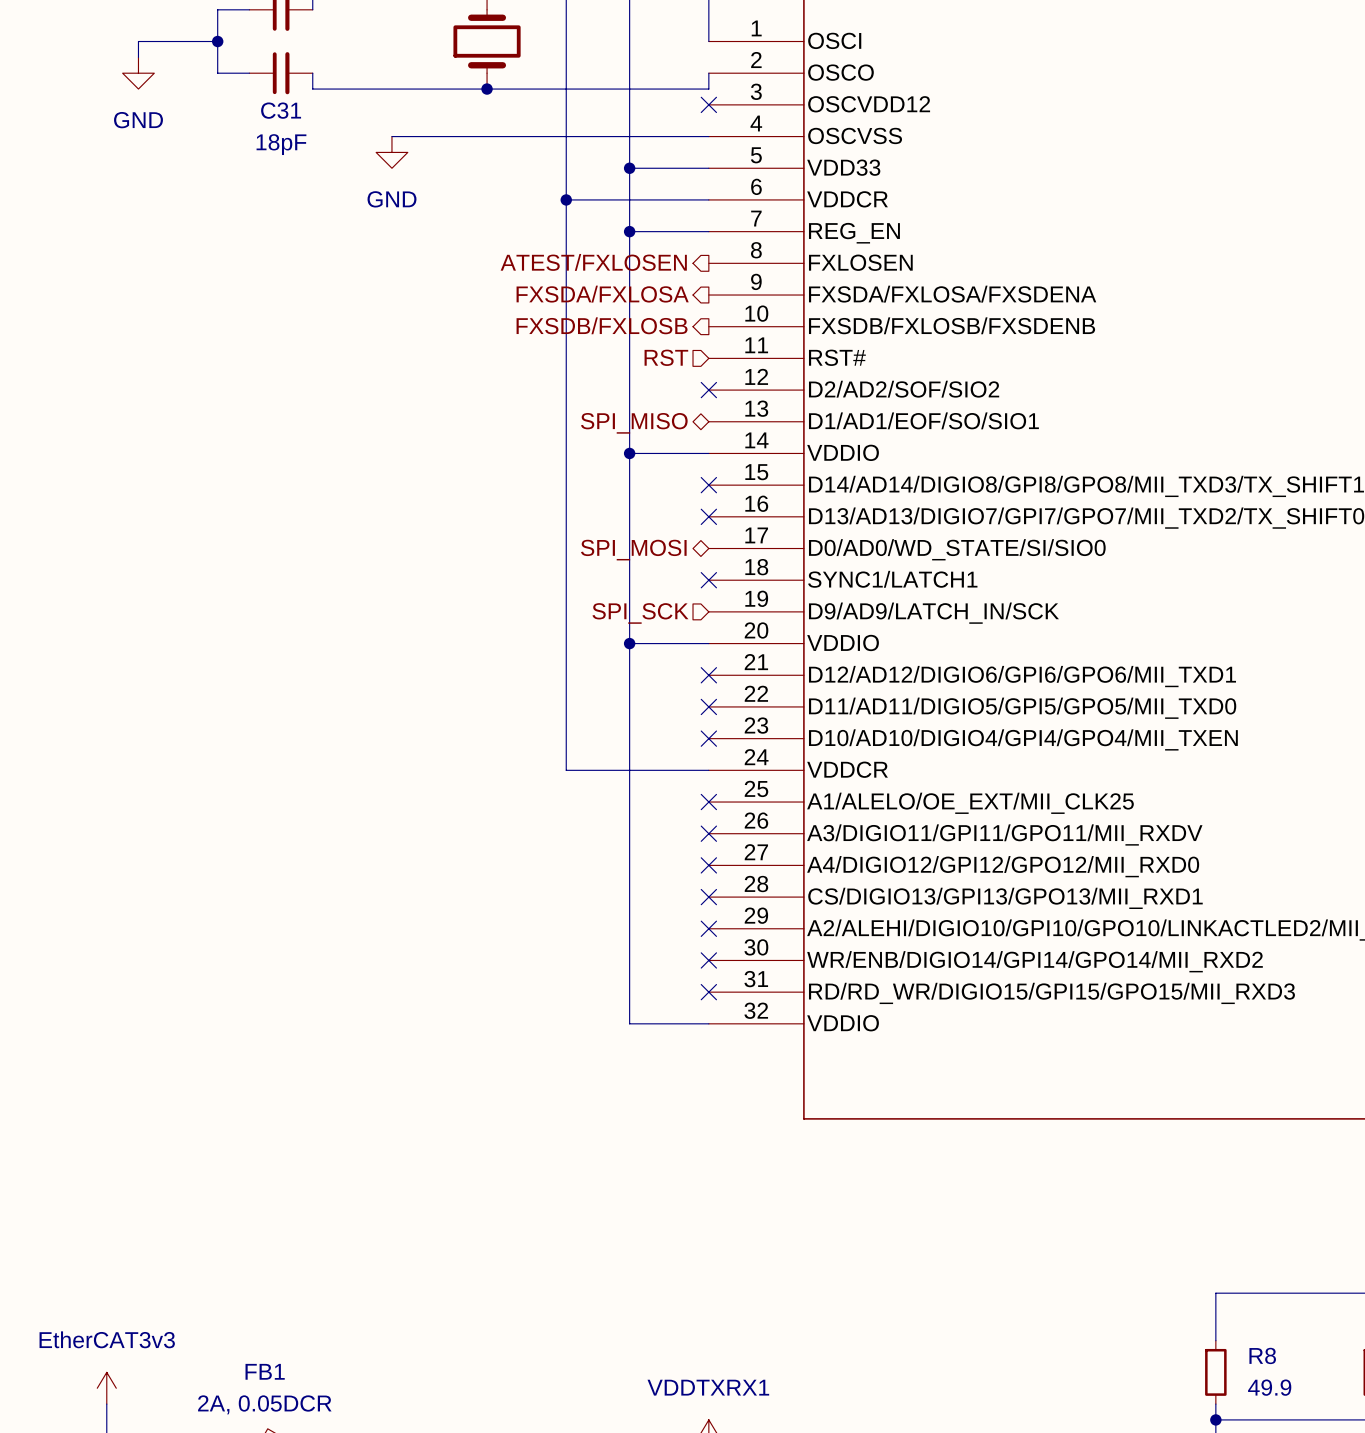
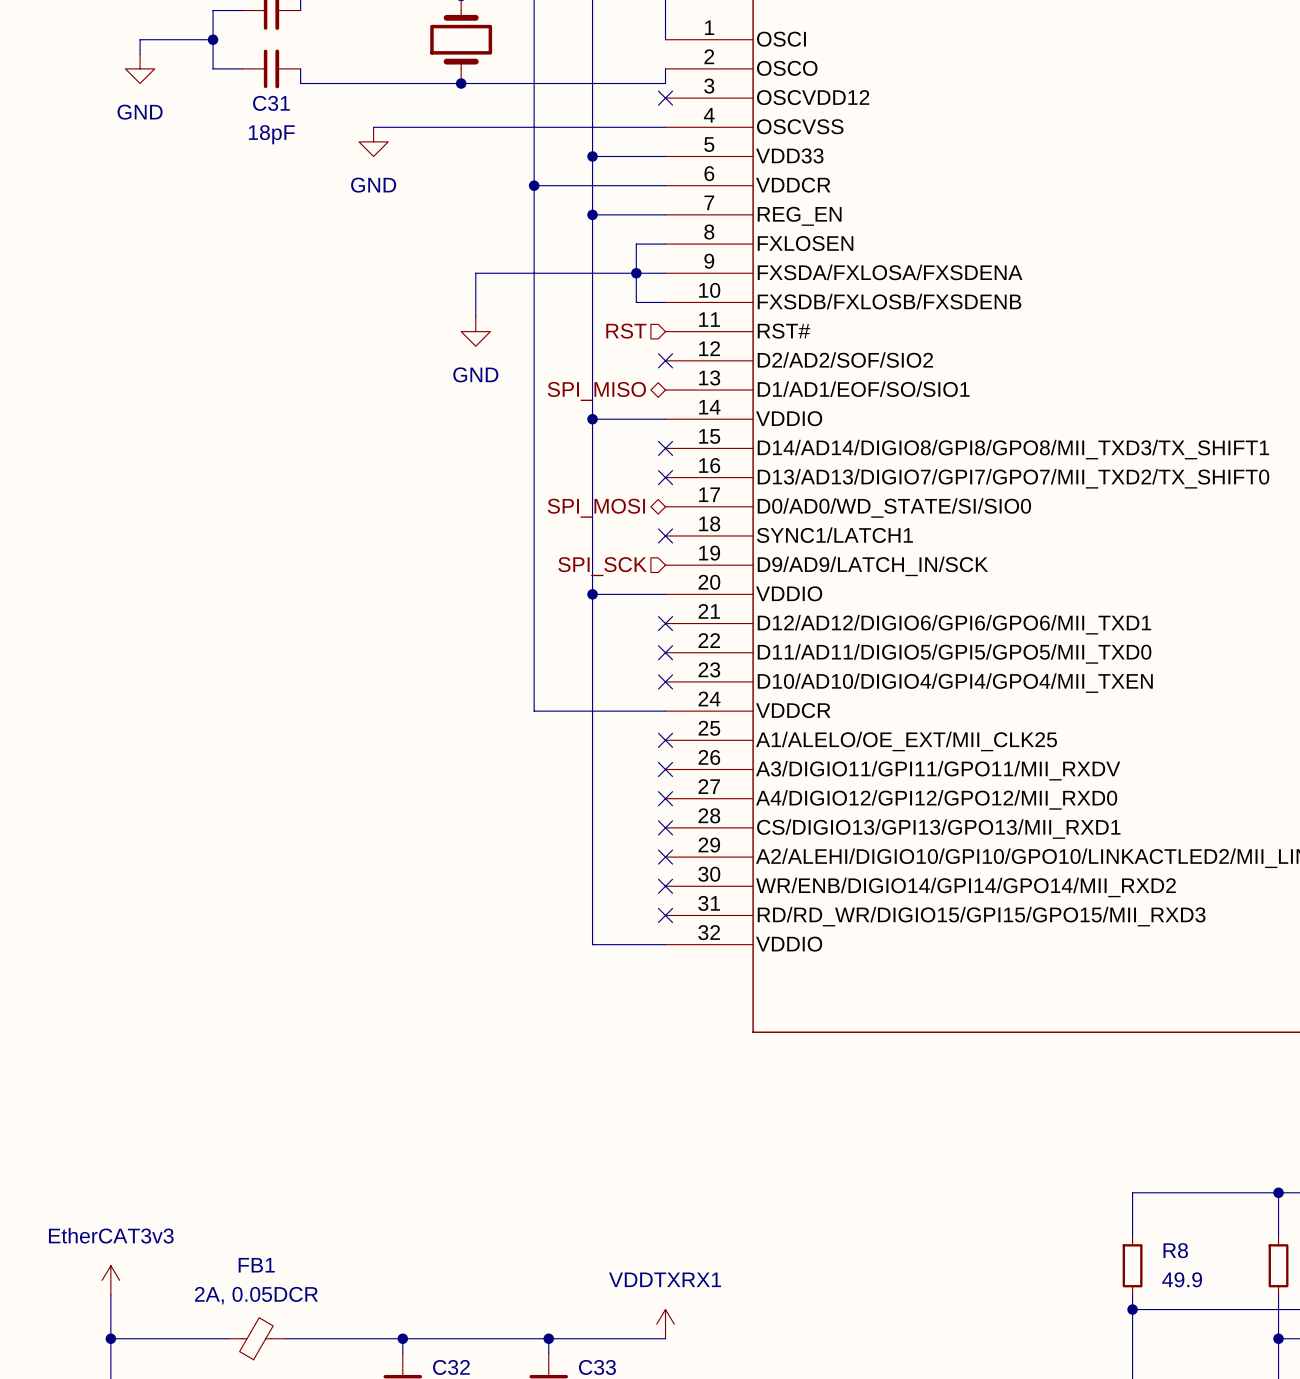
hierarchical label: ATEST/FXLOSEN (593, 262) -> none
wire: none -> (665, 244) (636, 244) (636, 302) (665, 302)
hierarchical label: FXSDA/FXLOSA (602, 294) -> none
junction: none -> (636, 273)
wire: none -> (665, 273) (475, 273) (475, 317)
hierarchical label: FXSDB/FXLOSB (602, 325) -> none
power symbol: none -> GND (475, 331)

